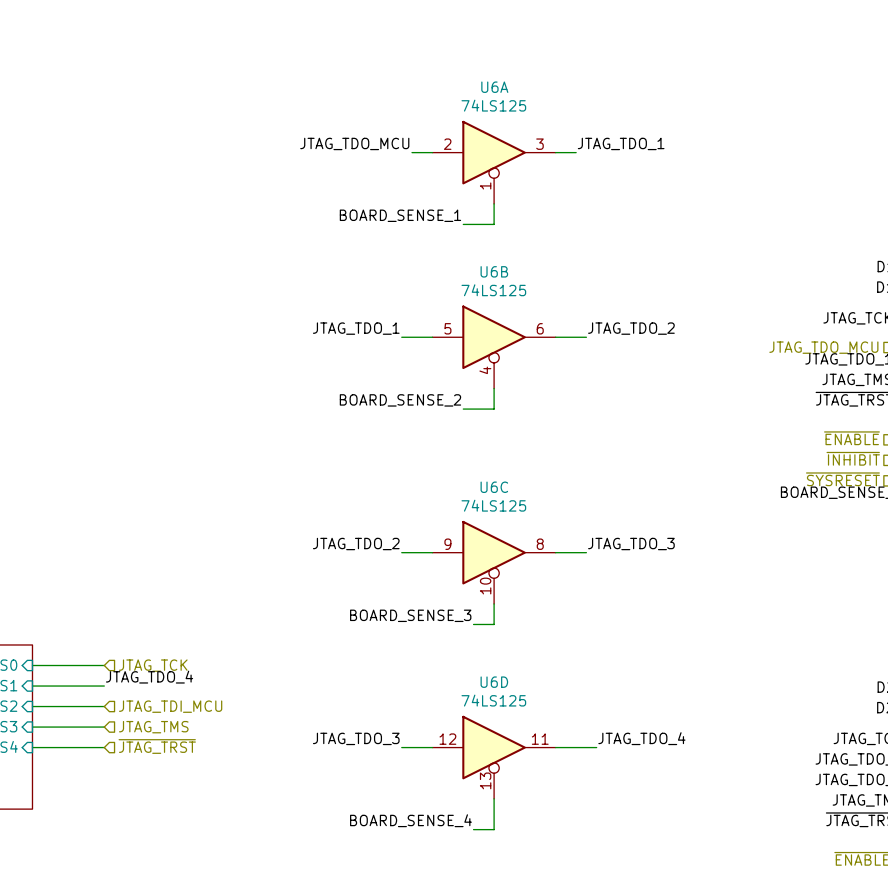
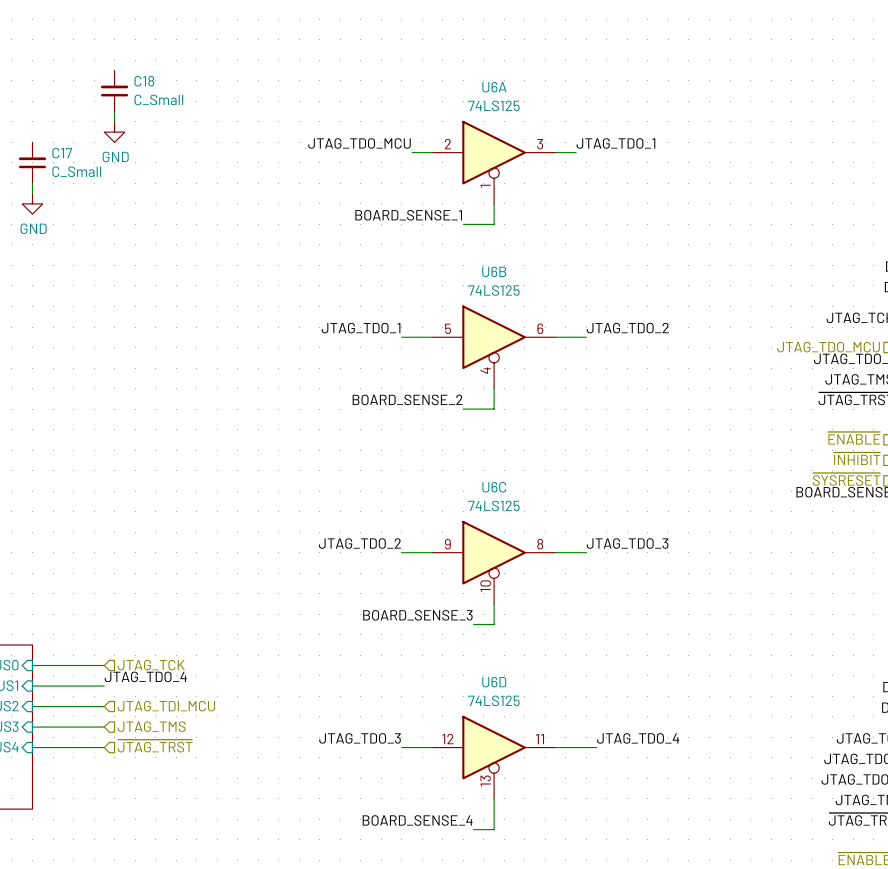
C18: none -> C_Small (114, 91)
wire: none -> (114, 111) (114, 121)
power symbol: none -> GND (114, 132)
C17: none -> C_Small (32, 162)
wire: none -> (32, 183) (32, 193)
power symbol: none -> GND (32, 203)

